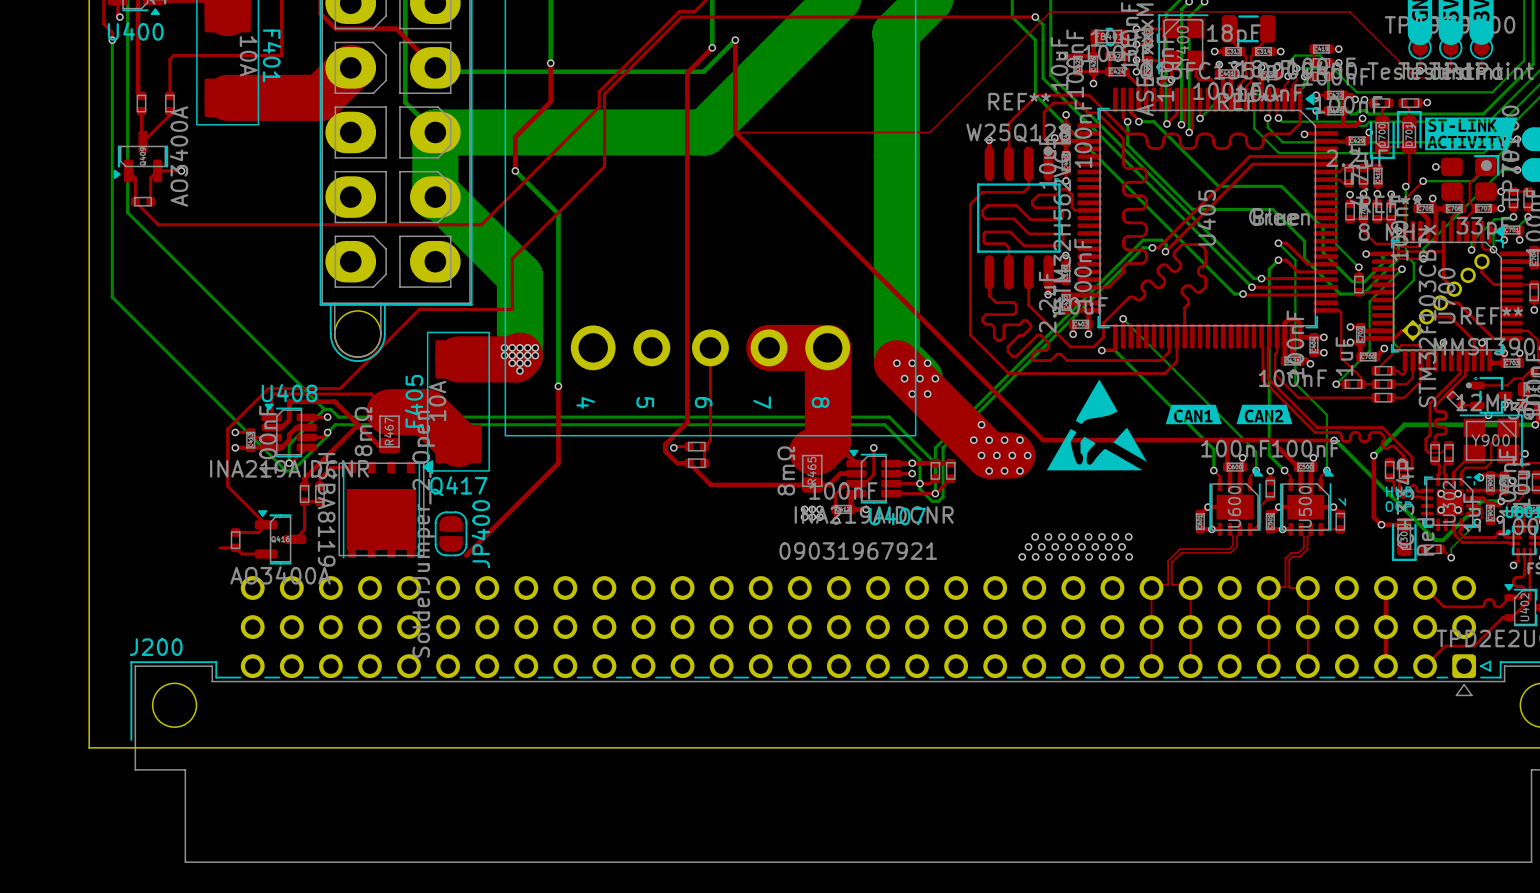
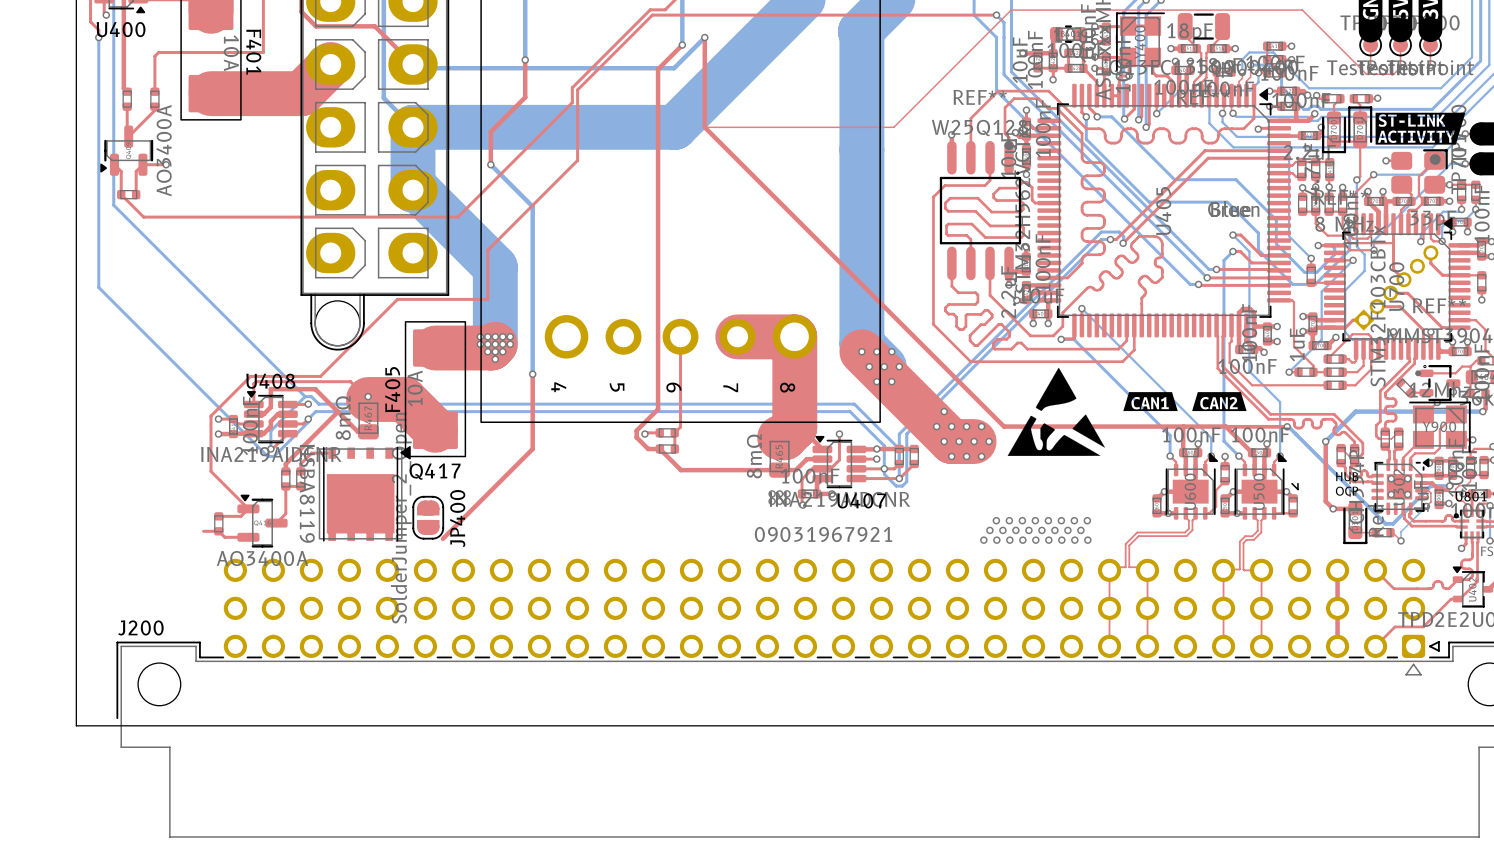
via: none -> (368, 396)

